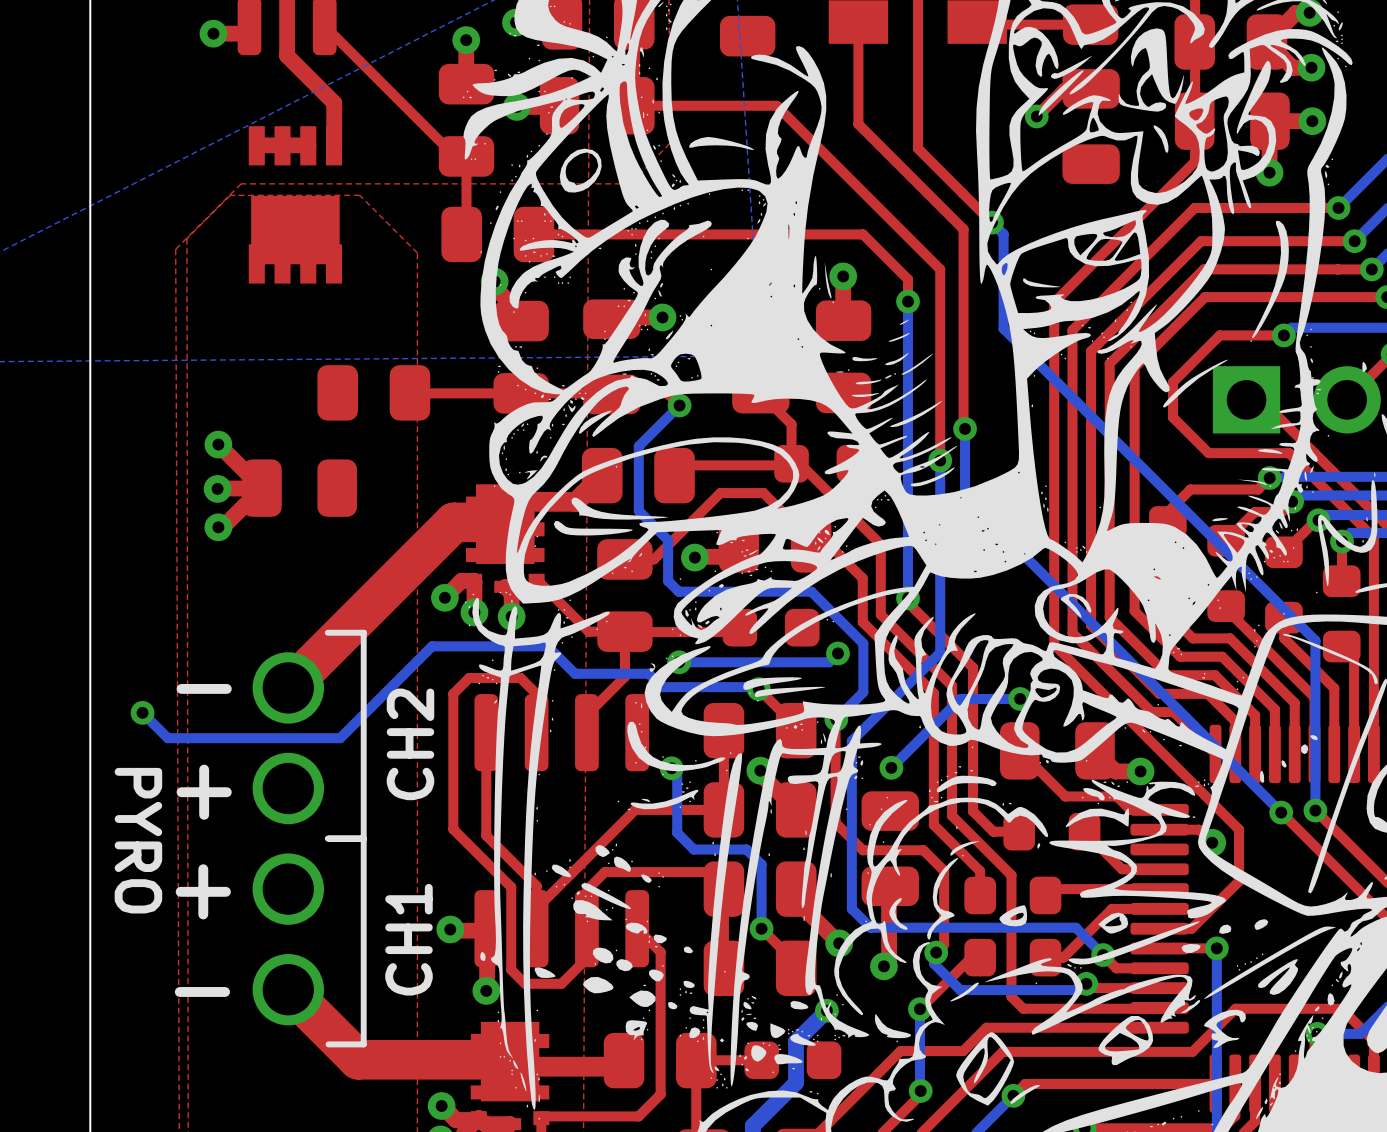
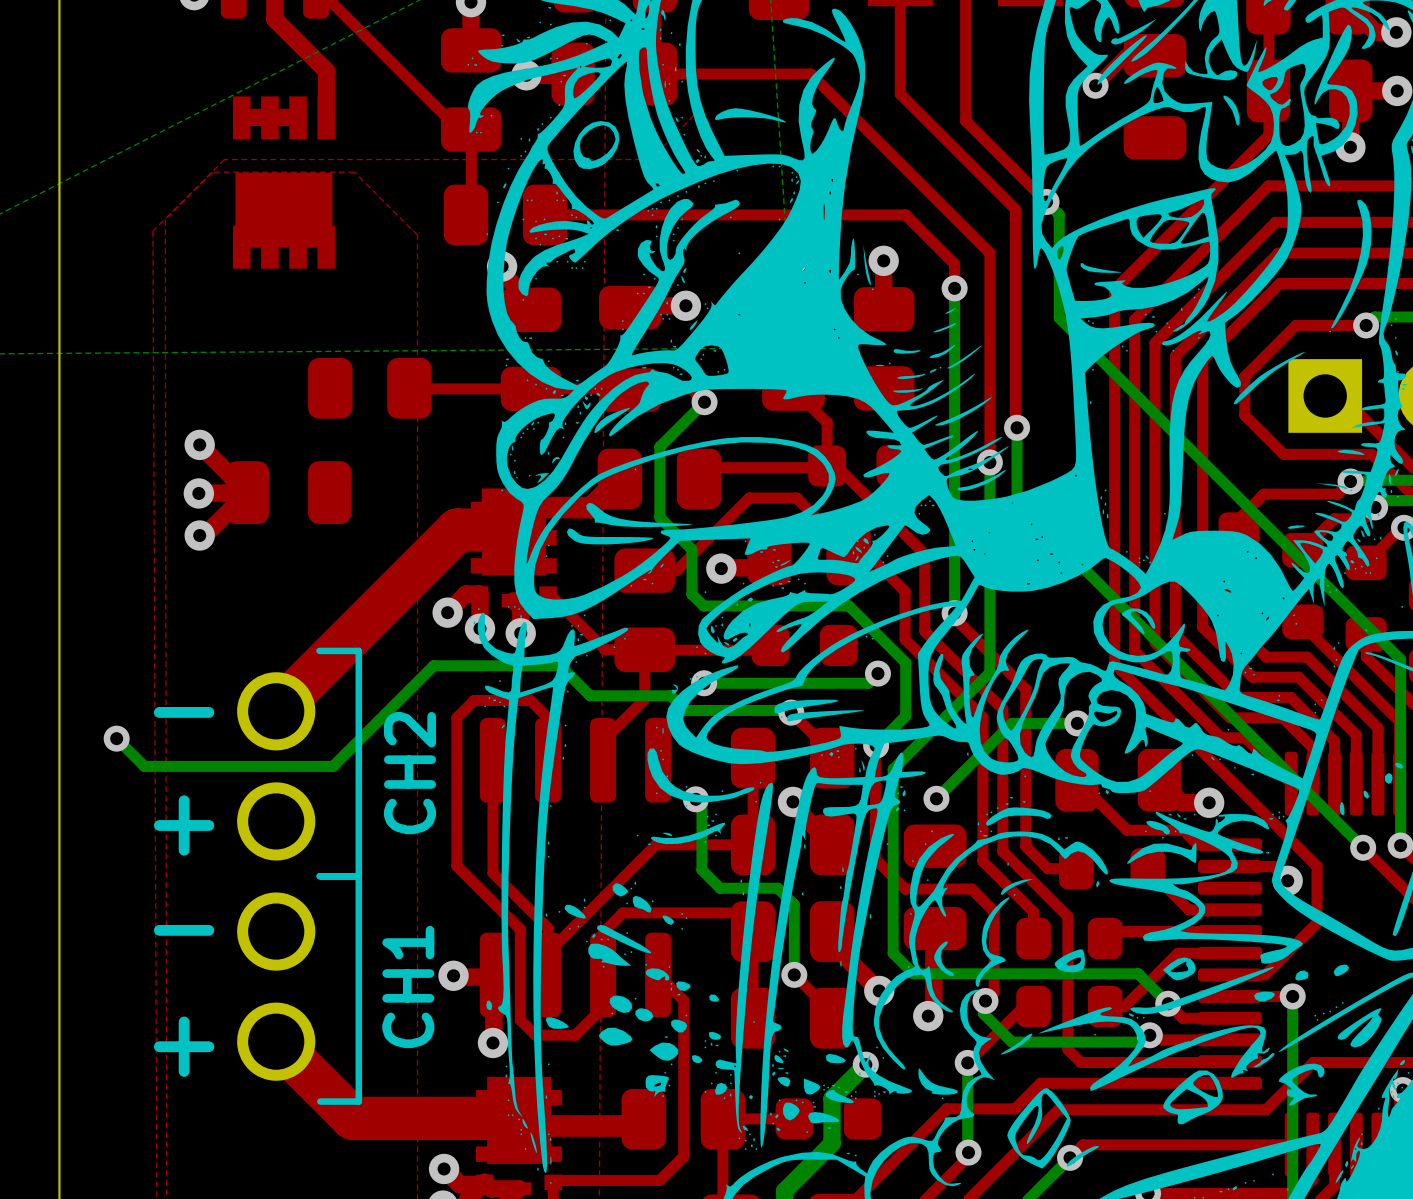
text: PYRO (138, 840) -> none
text: + (203, 891) -> - (184, 930)
text: - (202, 991) -> + (184, 1046)

